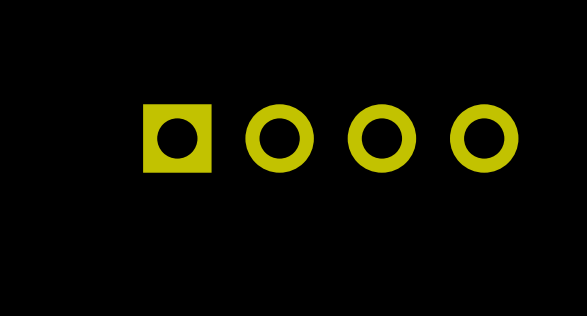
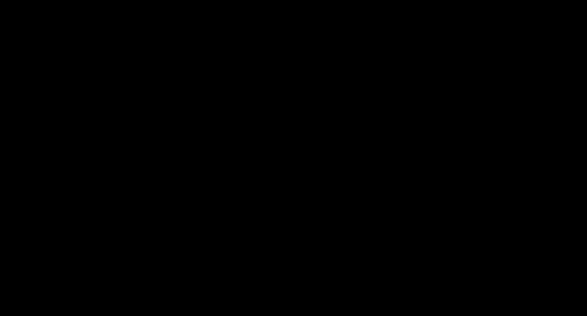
part: (330, 138) -> none

